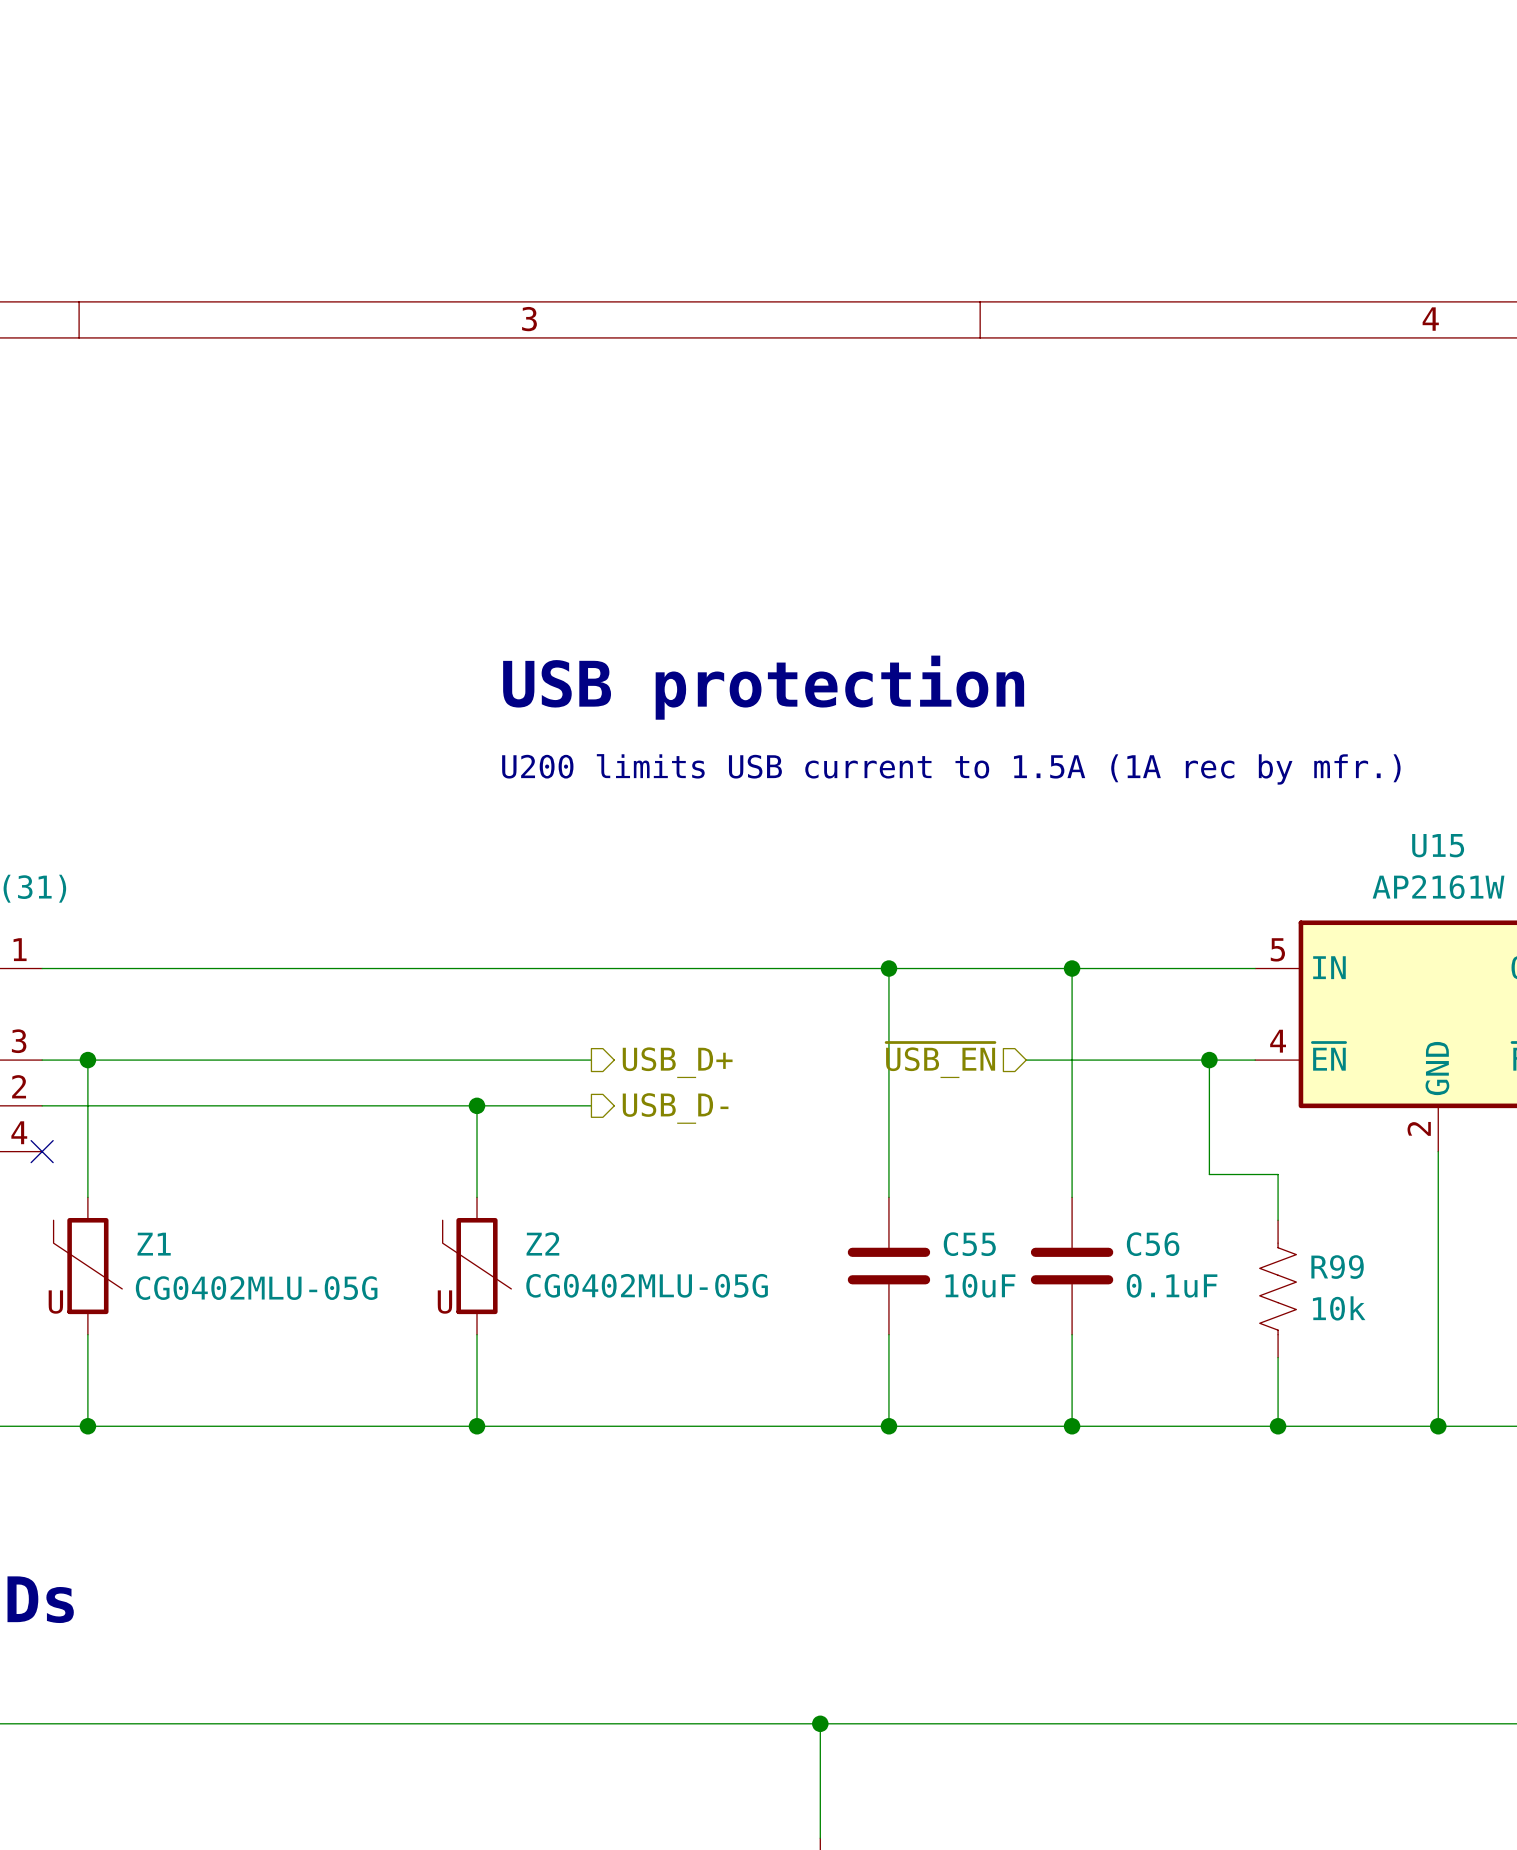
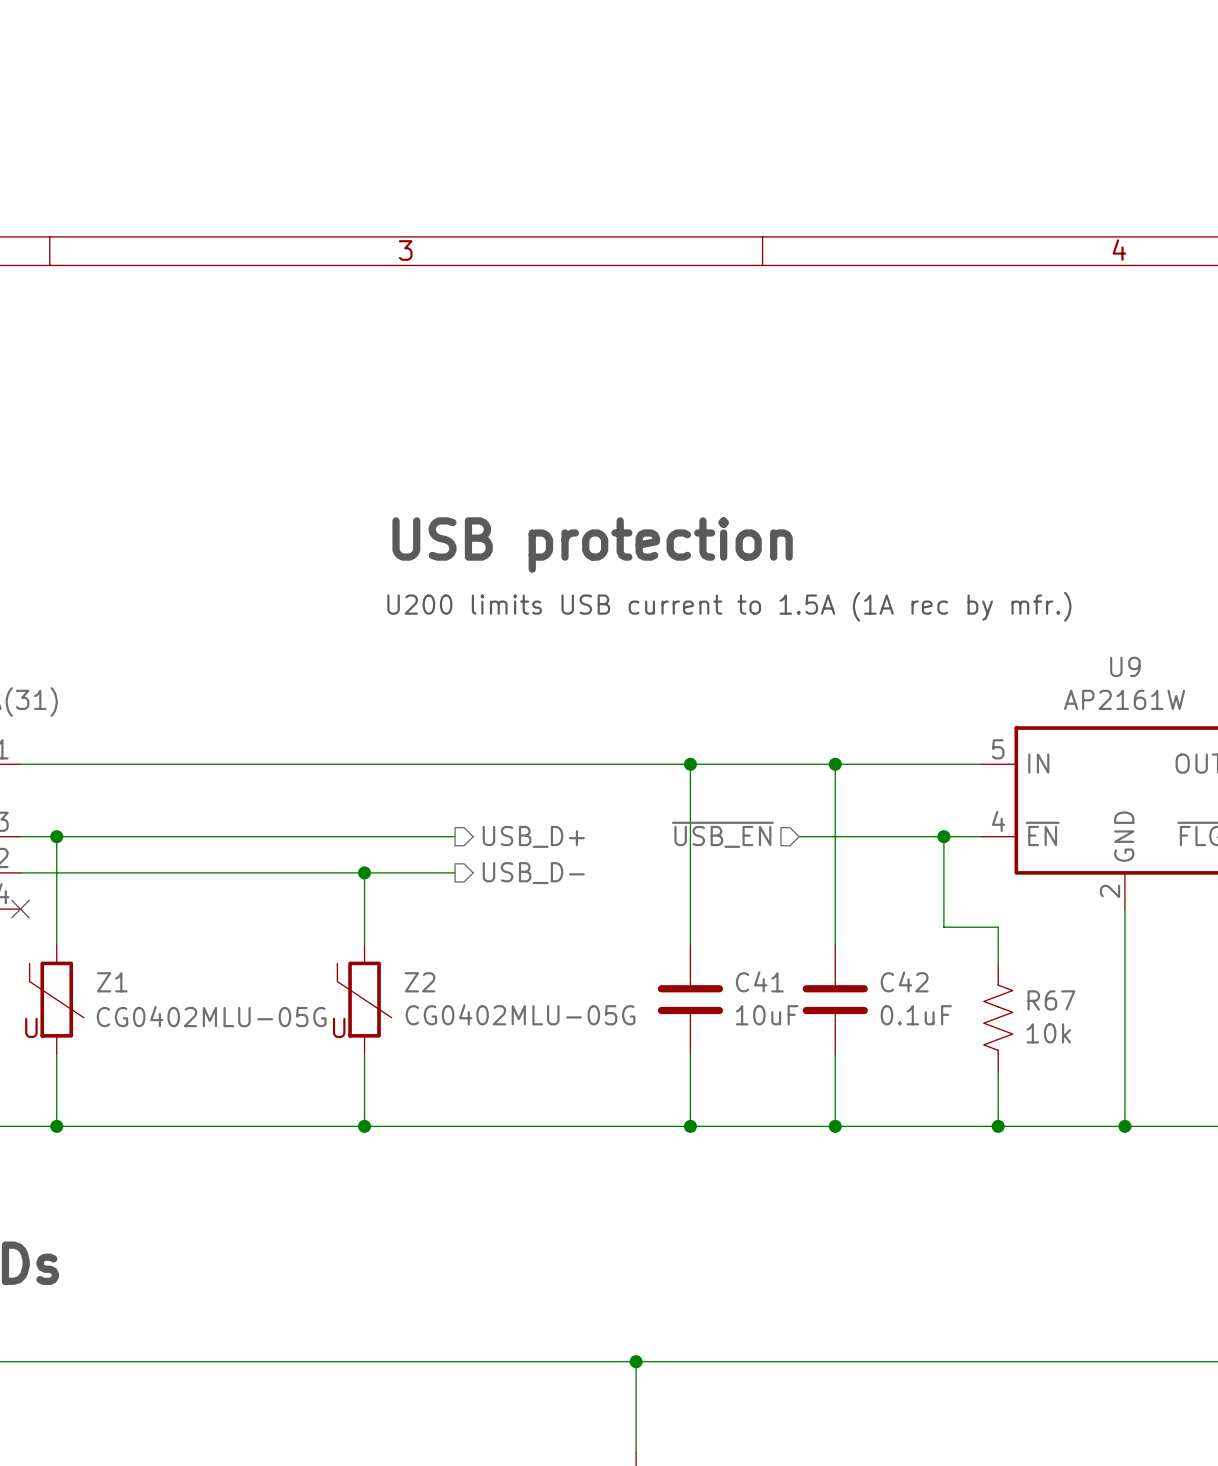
U15 name: U15 (1438, 845) -> U9 (1125, 666)
C55 name: C55 (969, 1244) -> C41 (759, 981)
C56 name: C56 (1153, 1244) -> C42 (904, 981)
R99 name: R99 (1337, 1267) -> R67 (1051, 1000)

